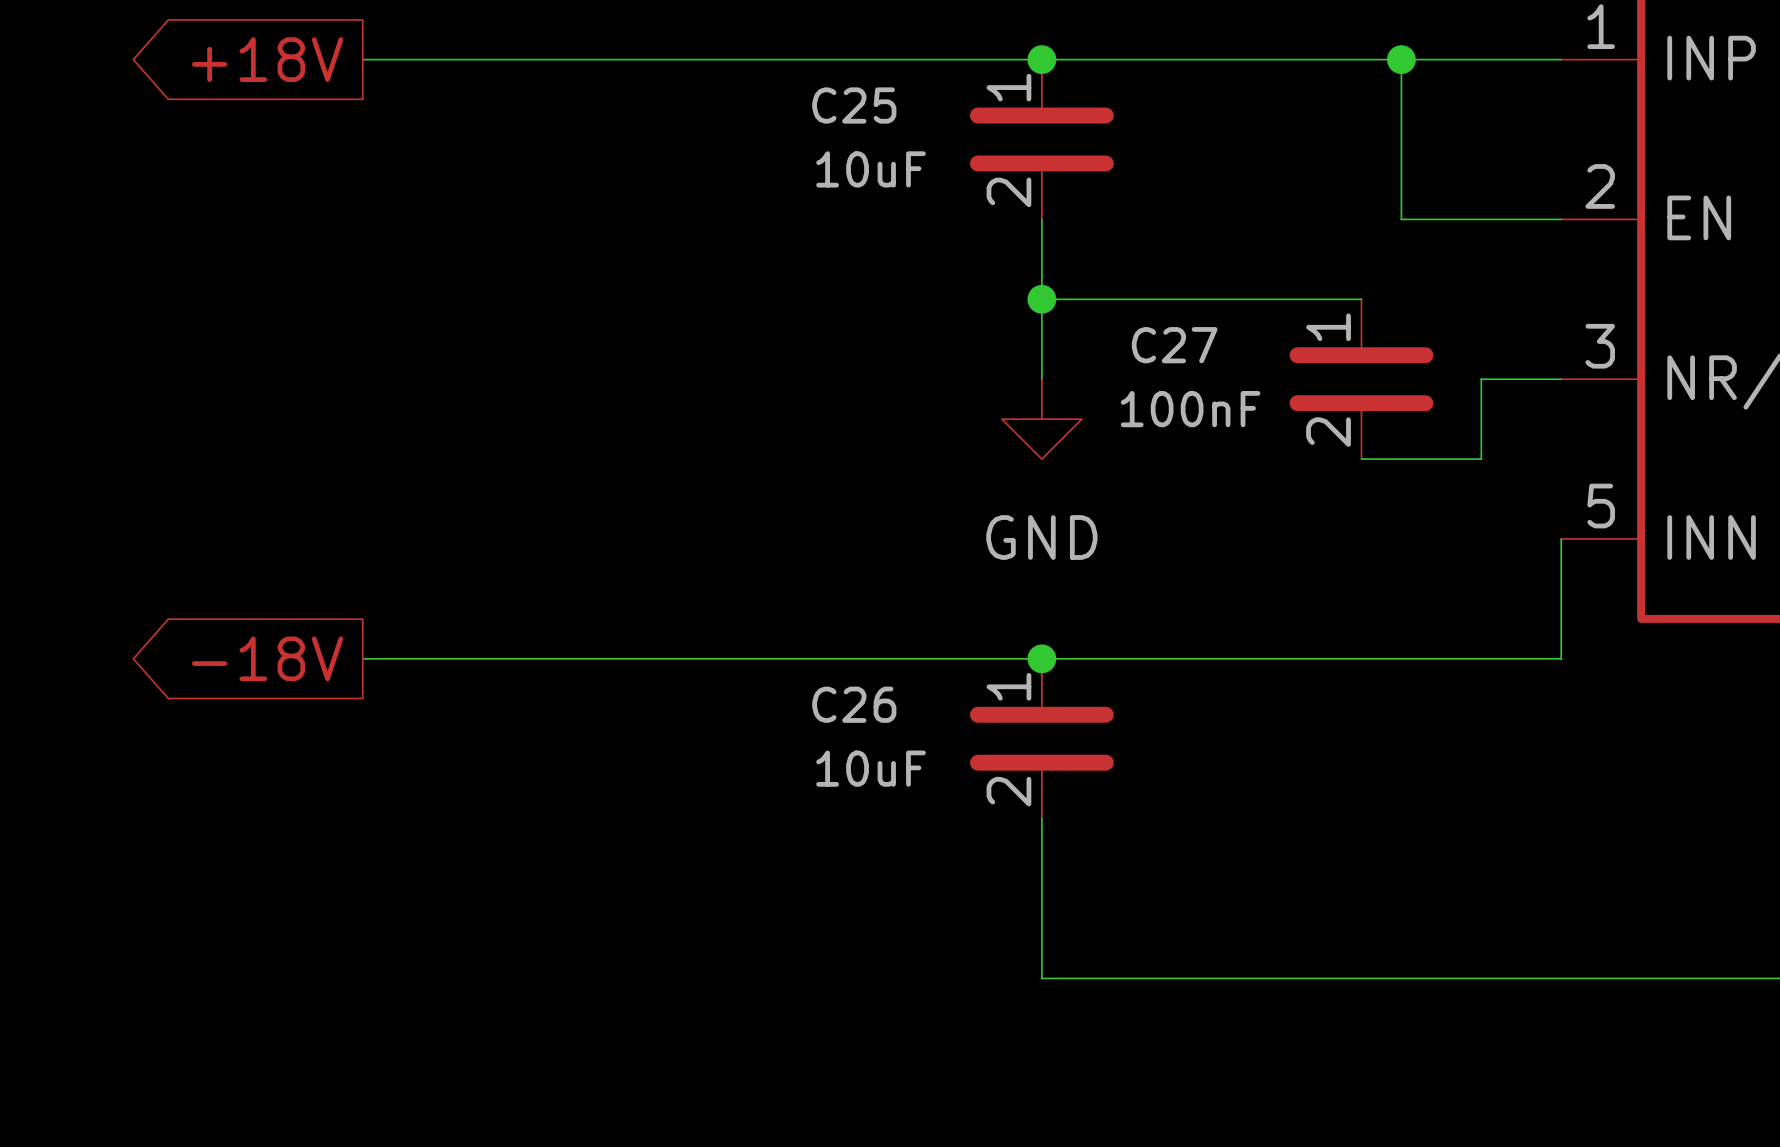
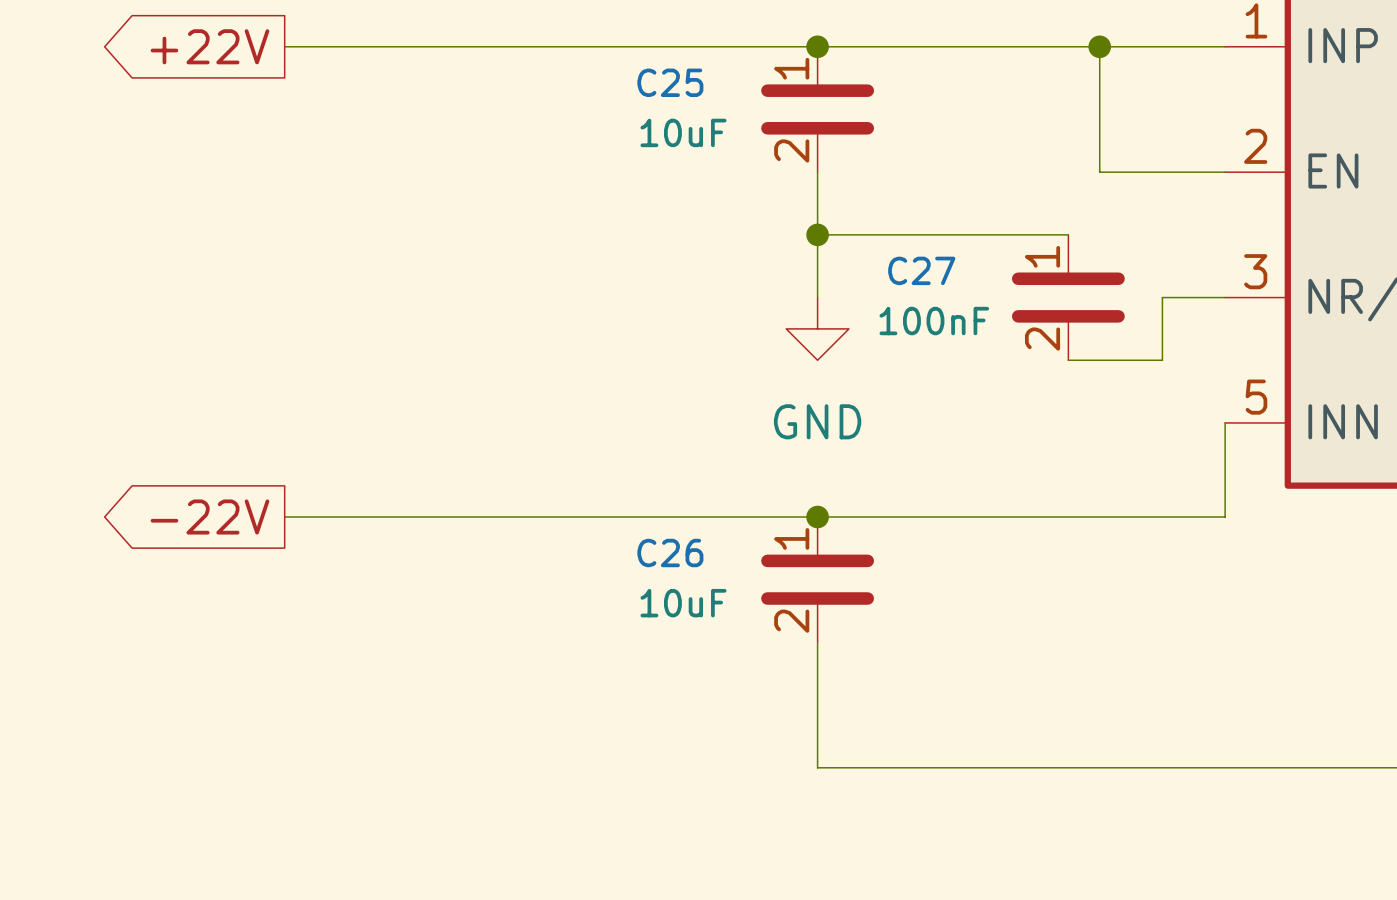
global label: +18V (267, 59) -> +22V (210, 46)
global label: -18V (267, 658) -> -22V (210, 517)

